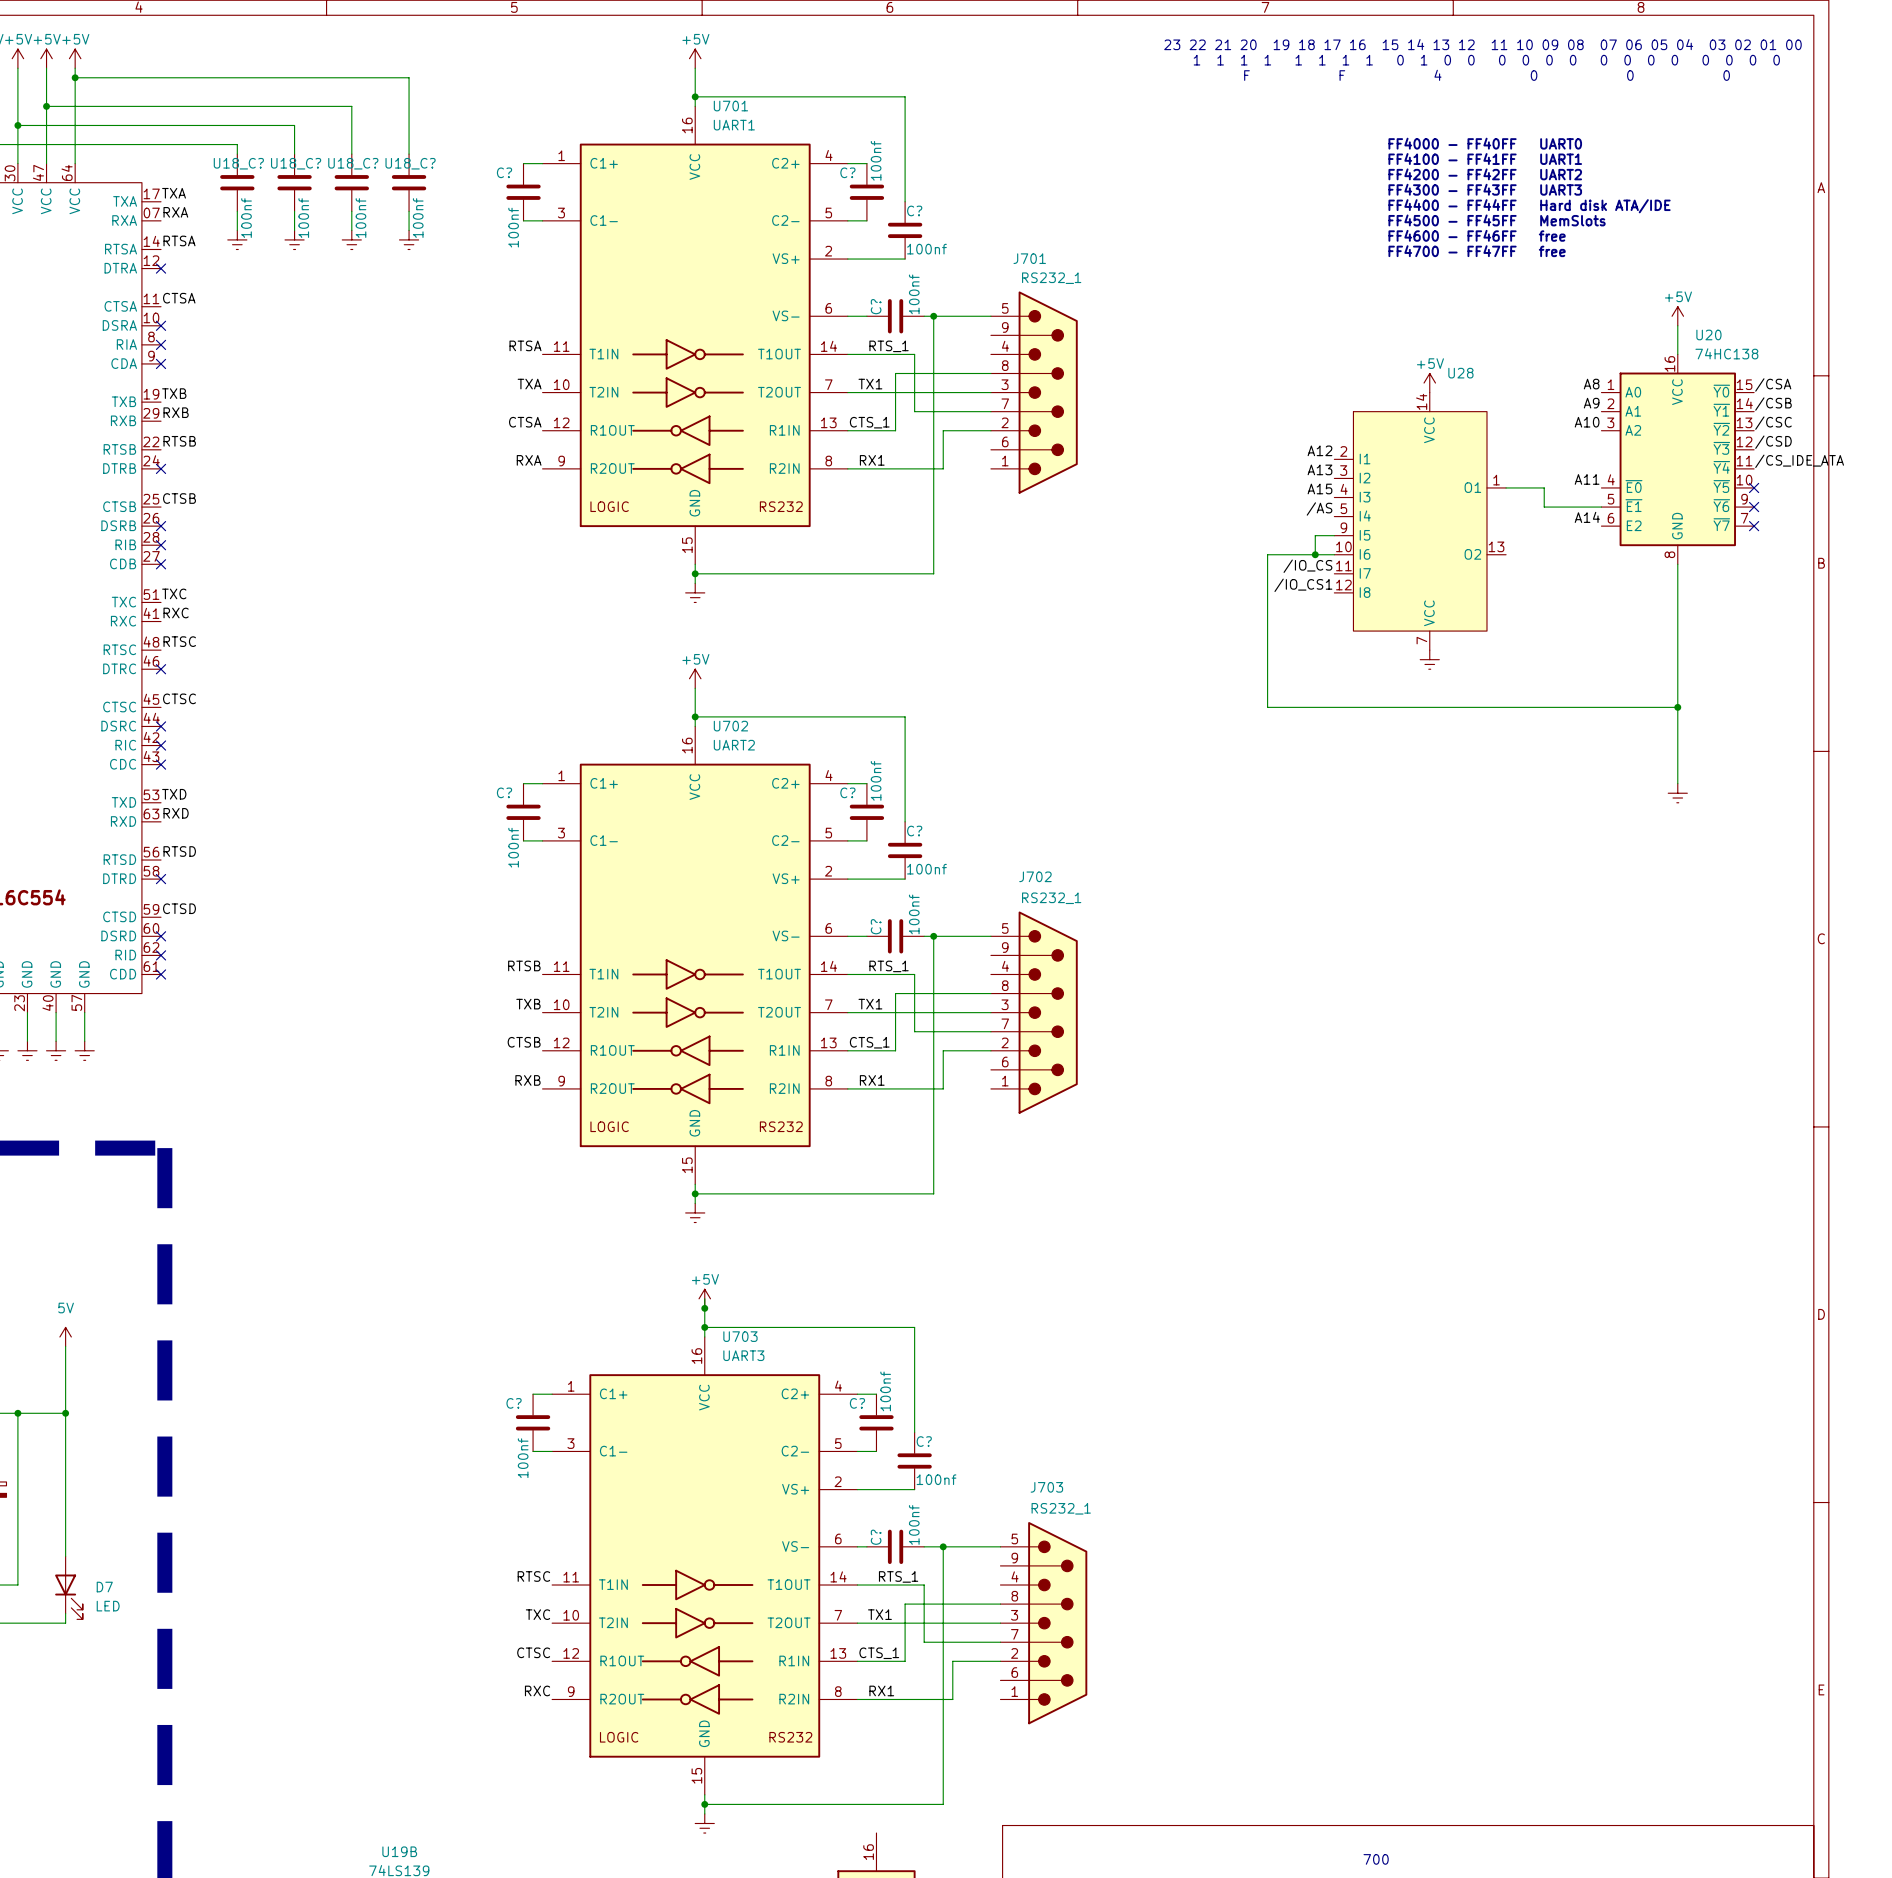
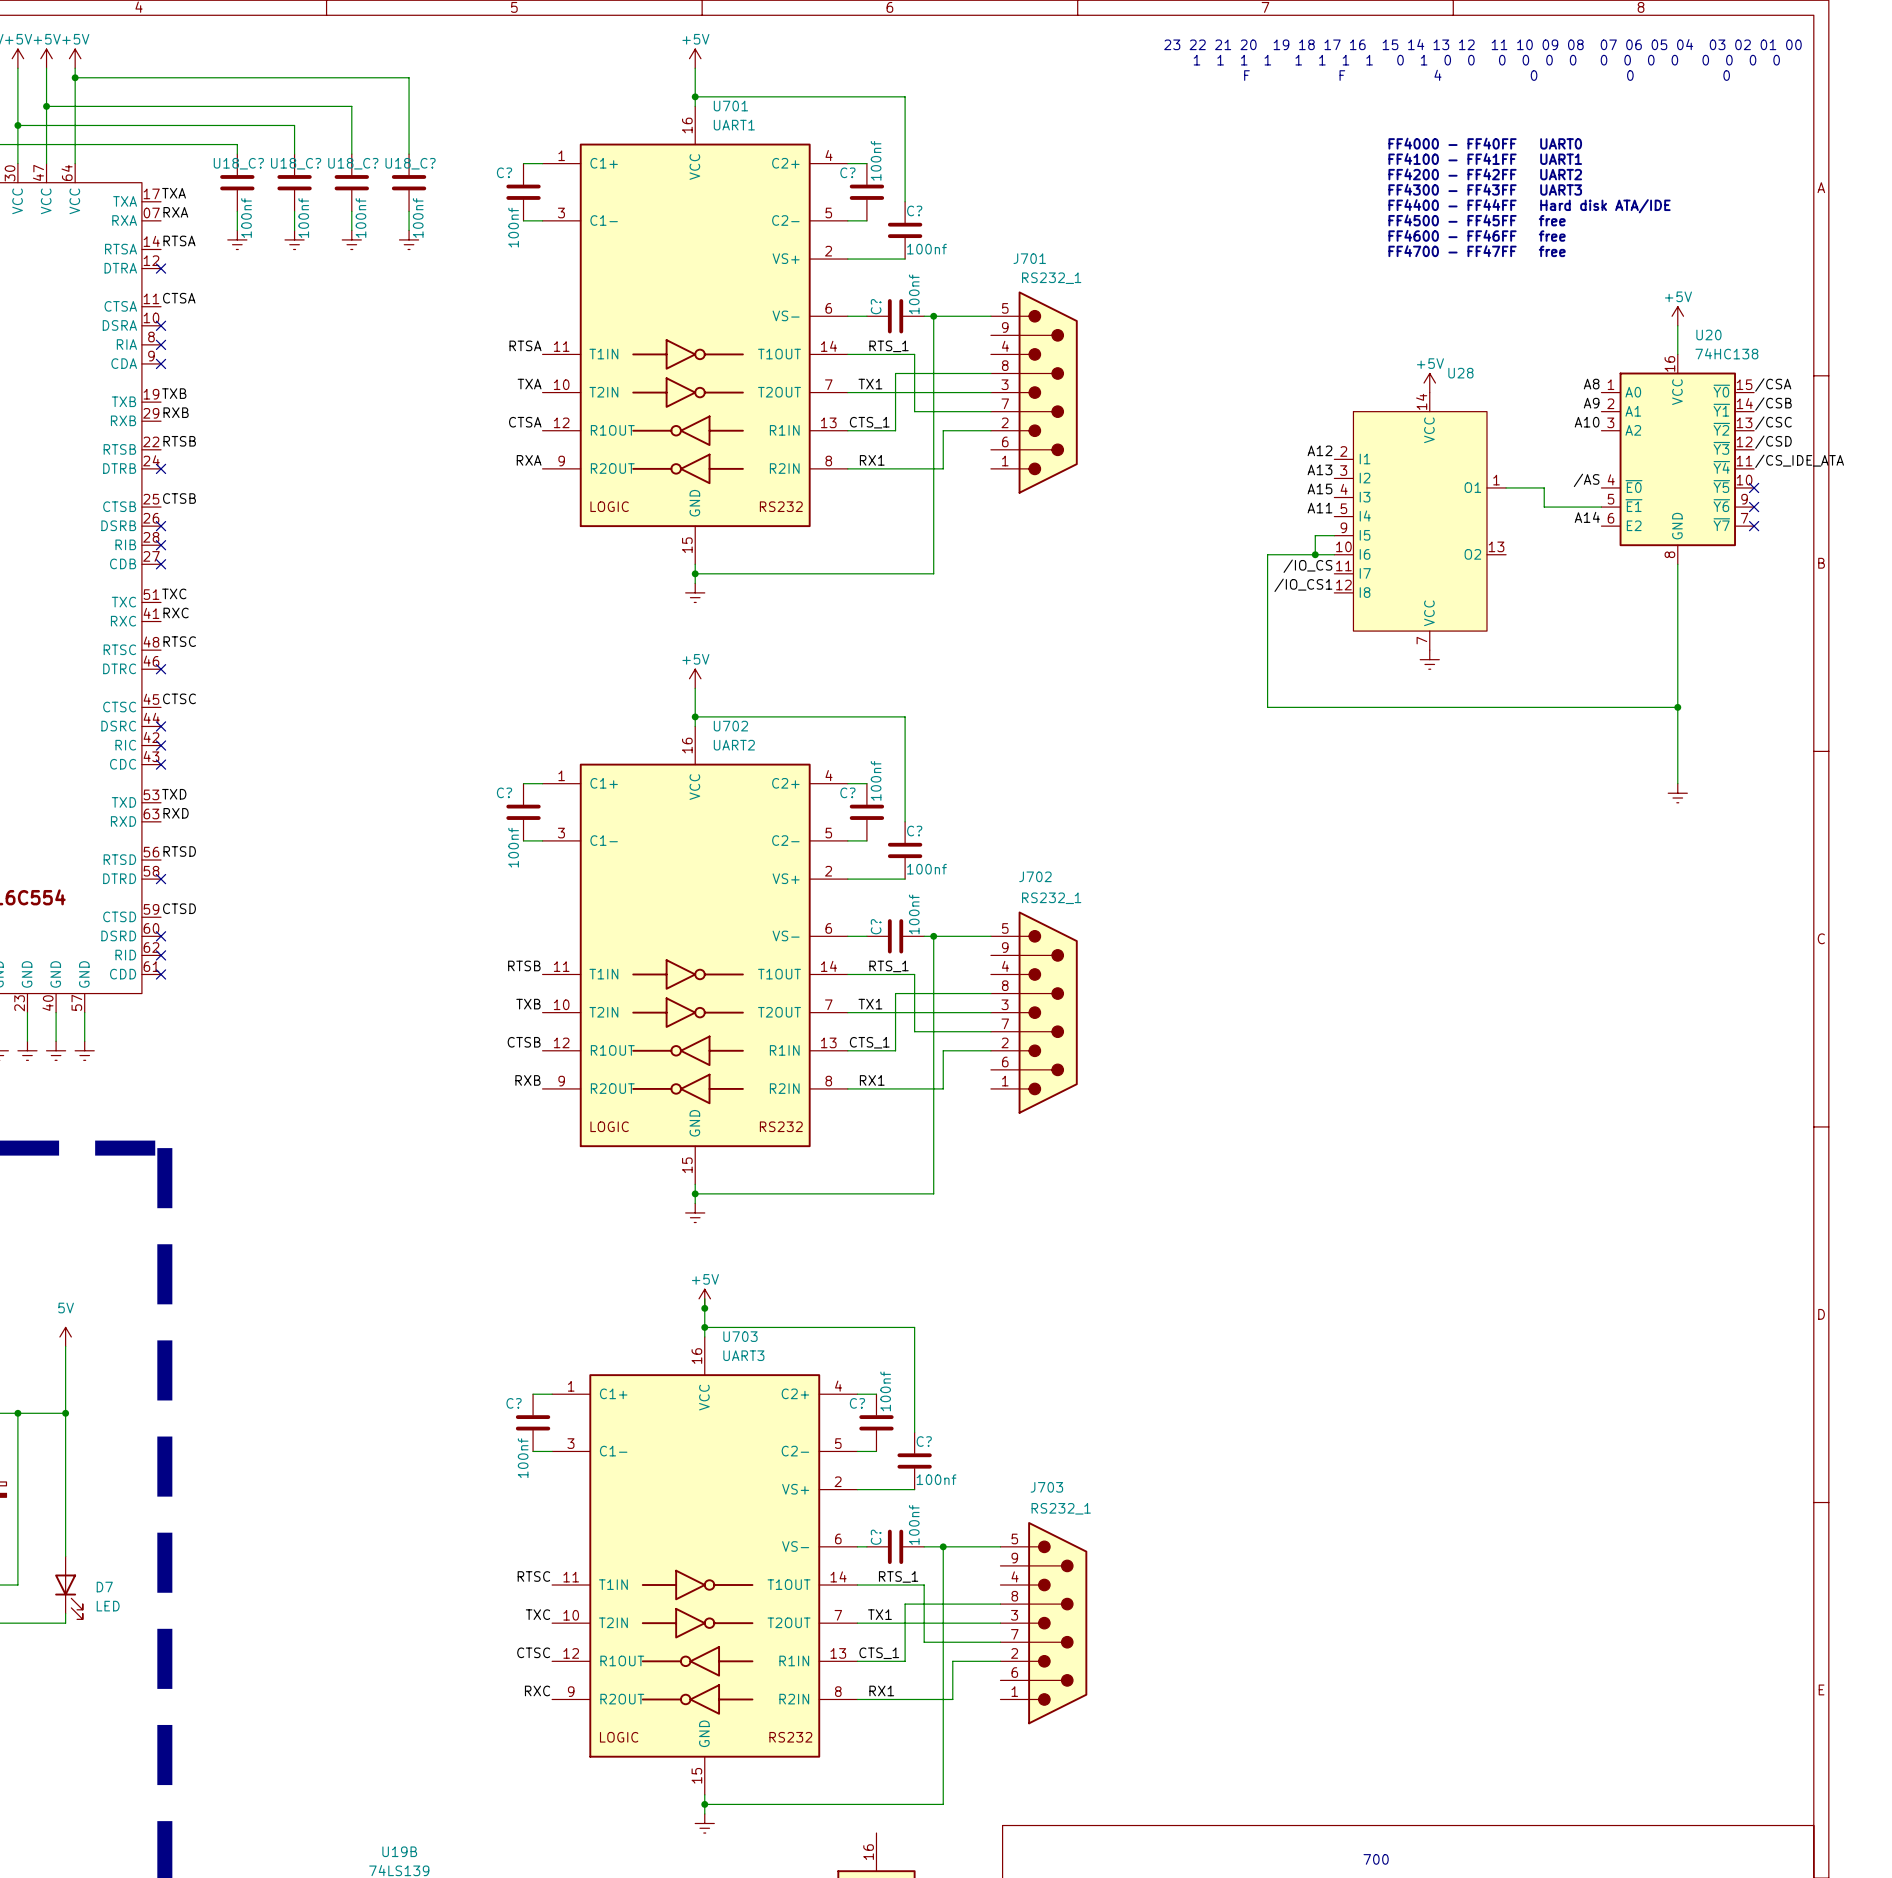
text: FF4500 - FF45FF MemSlots (1497, 220) -> FF4500 - FF45FF free (1477, 220)
label: A11 (1587, 479) -> /AS (1586, 480)
label: /AS (1319, 508) -> A11 (1319, 508)

